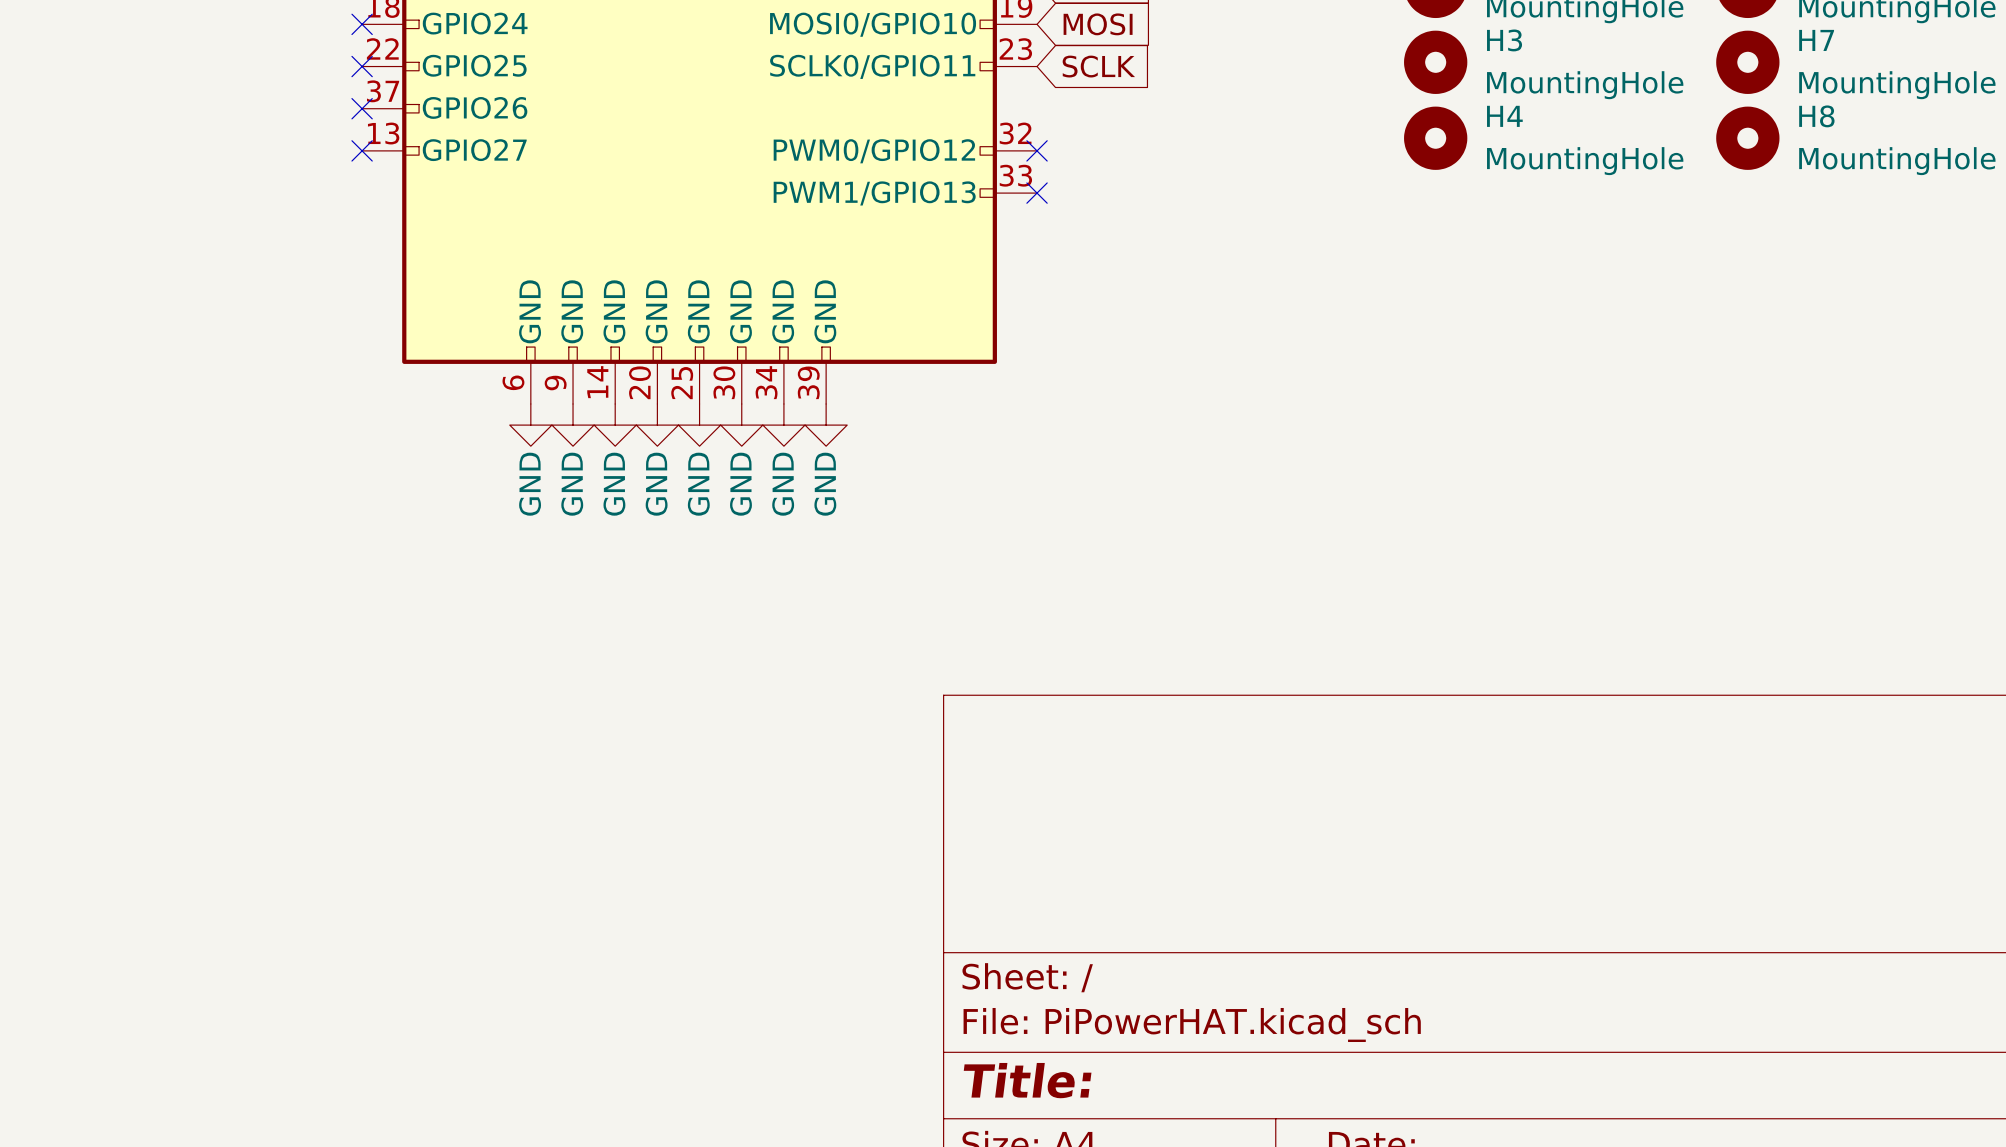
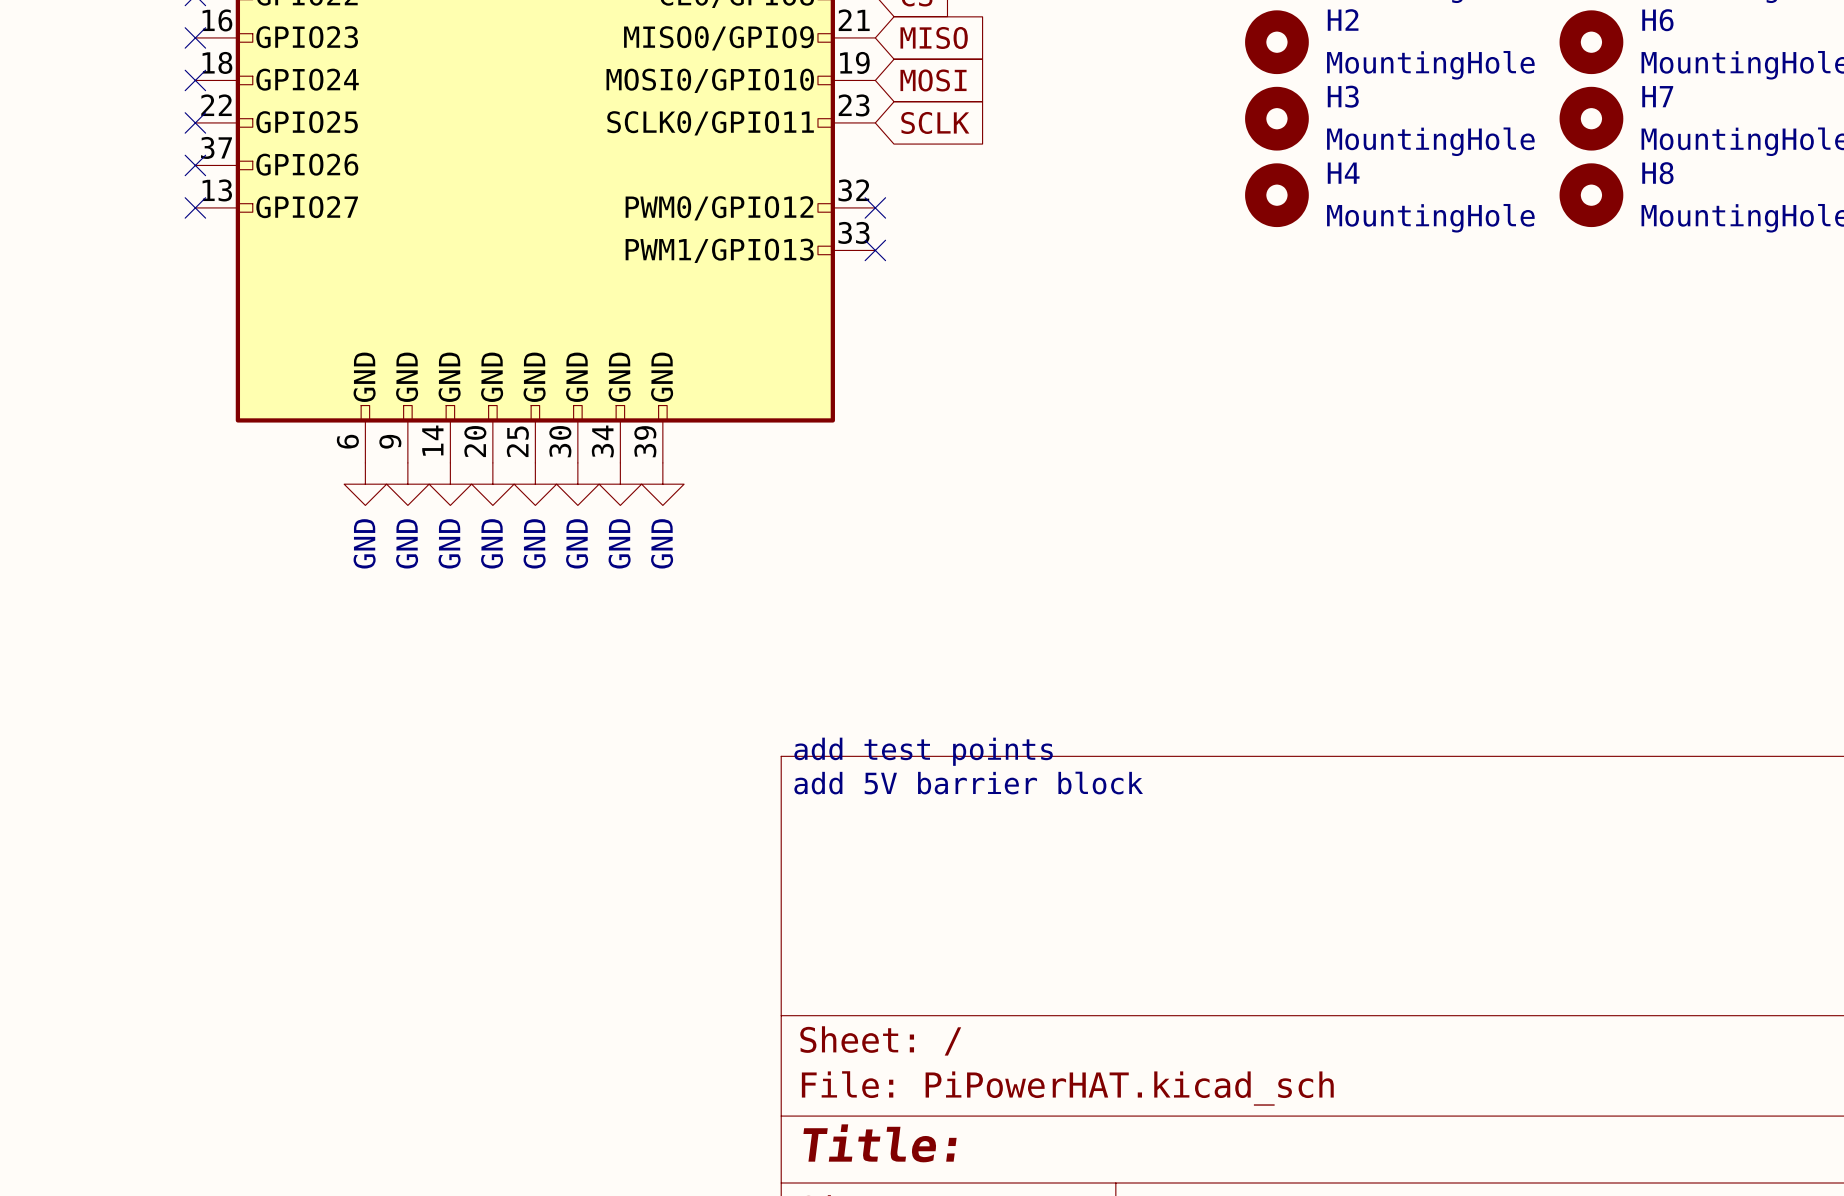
text: none -> add test points (923, 751)
text: none -> add 5V barrier block (968, 783)

